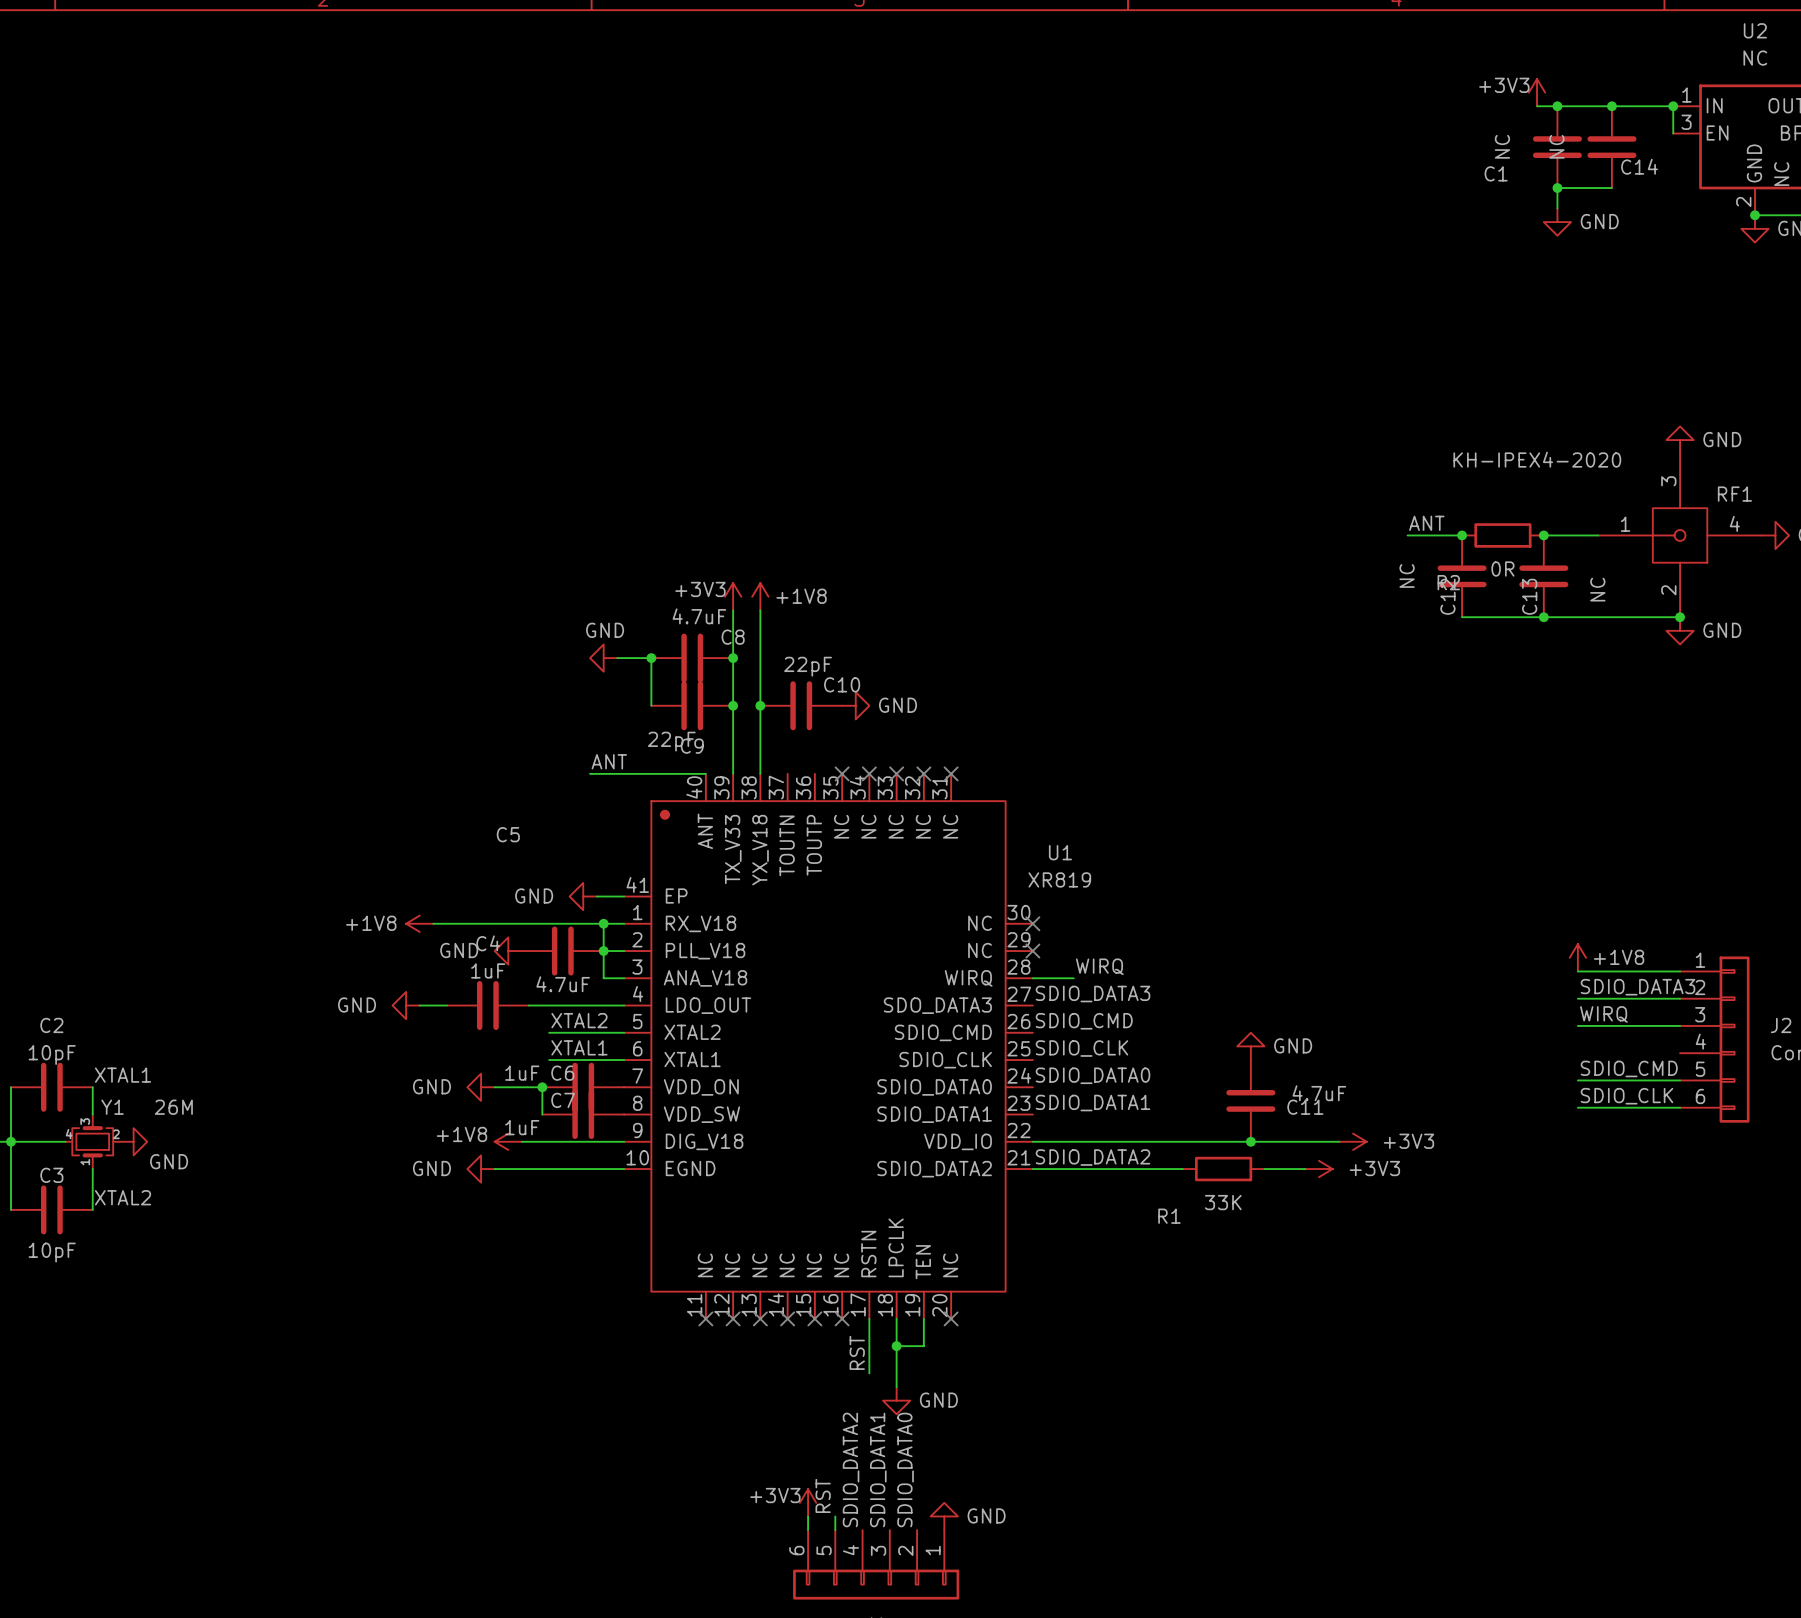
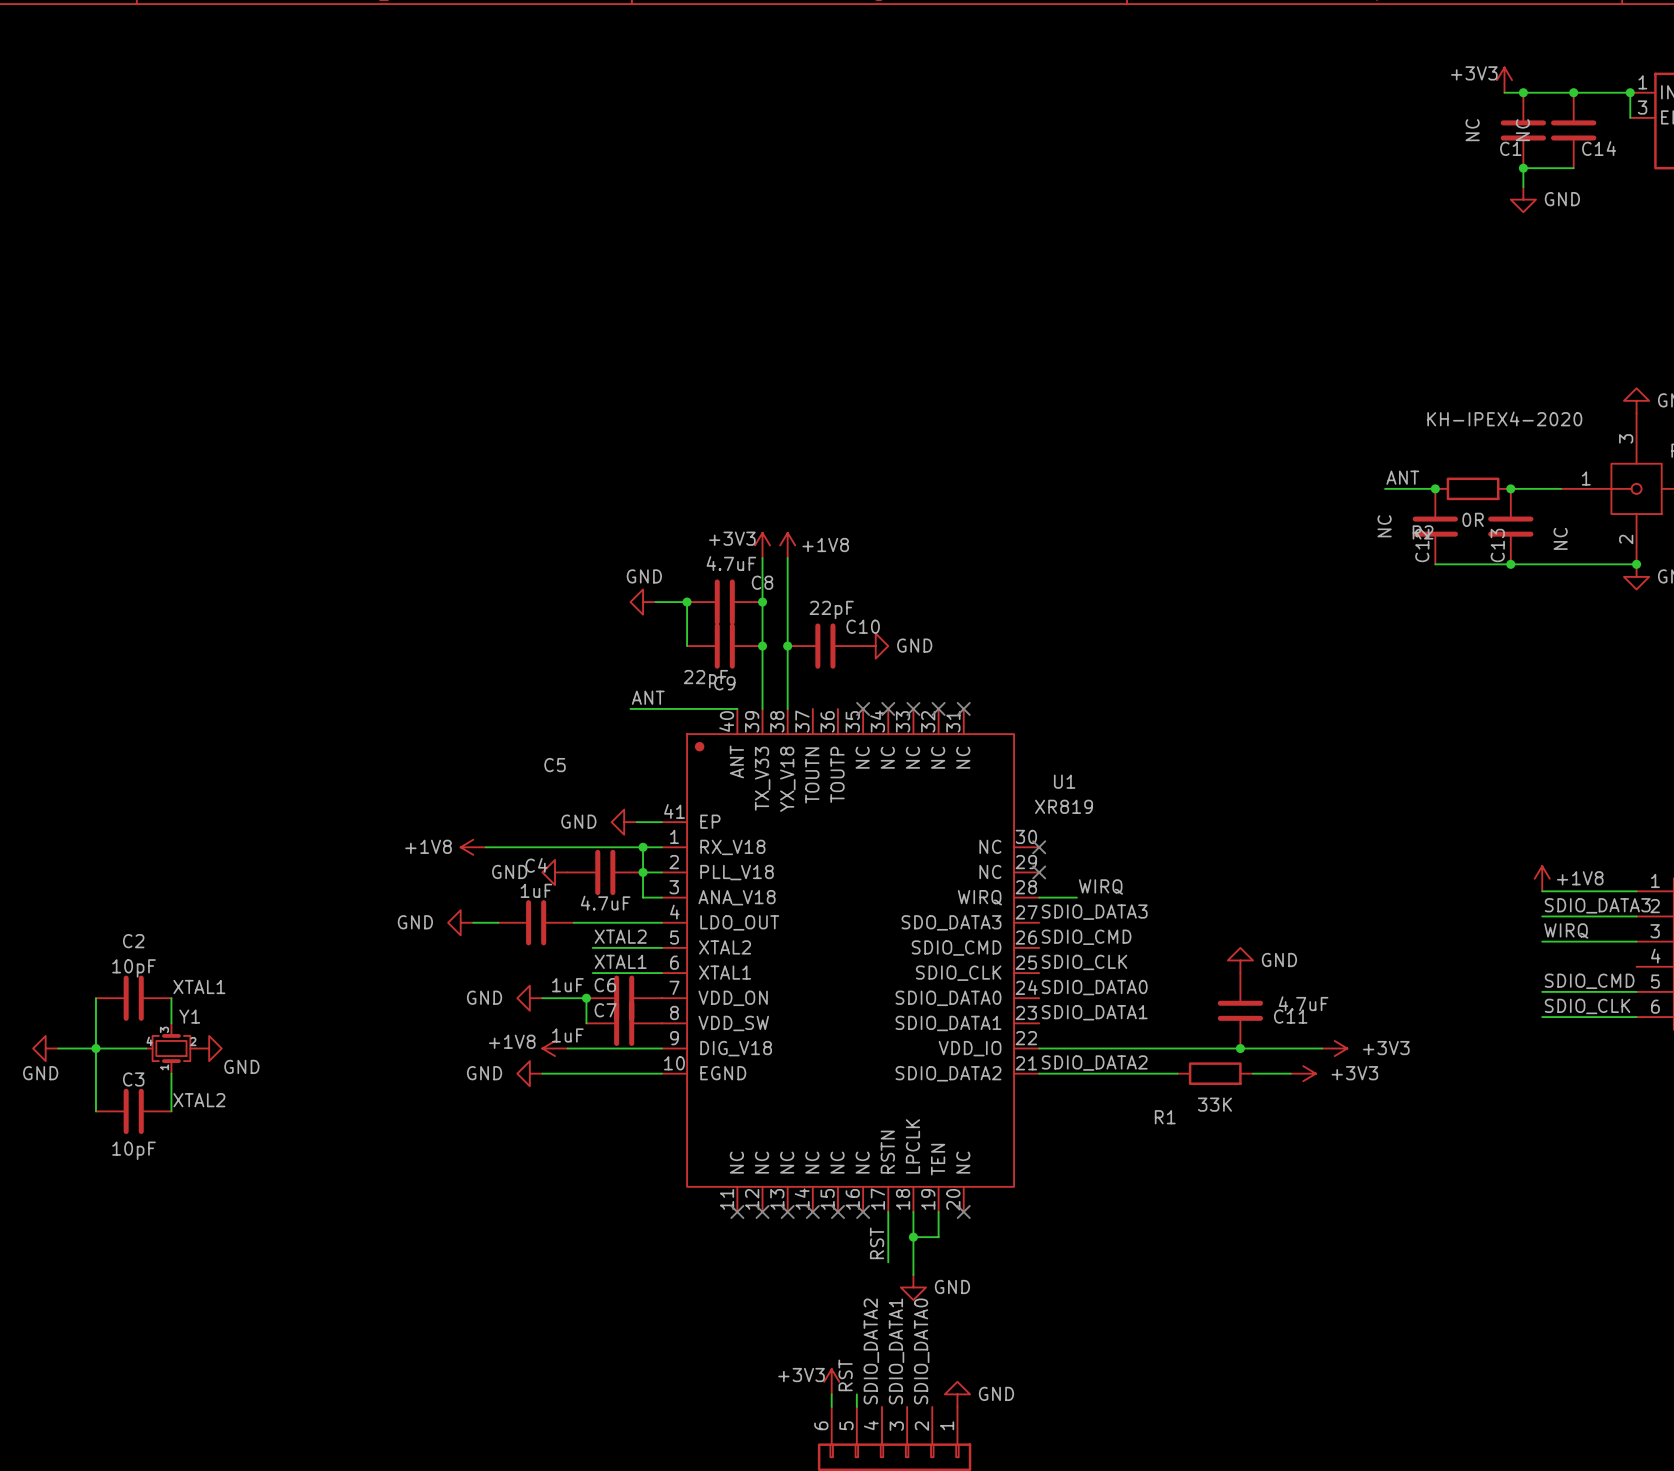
C1 name position: C1 (1496, 173) -> C1 (1510, 148)
Y1 value: 26M (173, 1107) -> none

